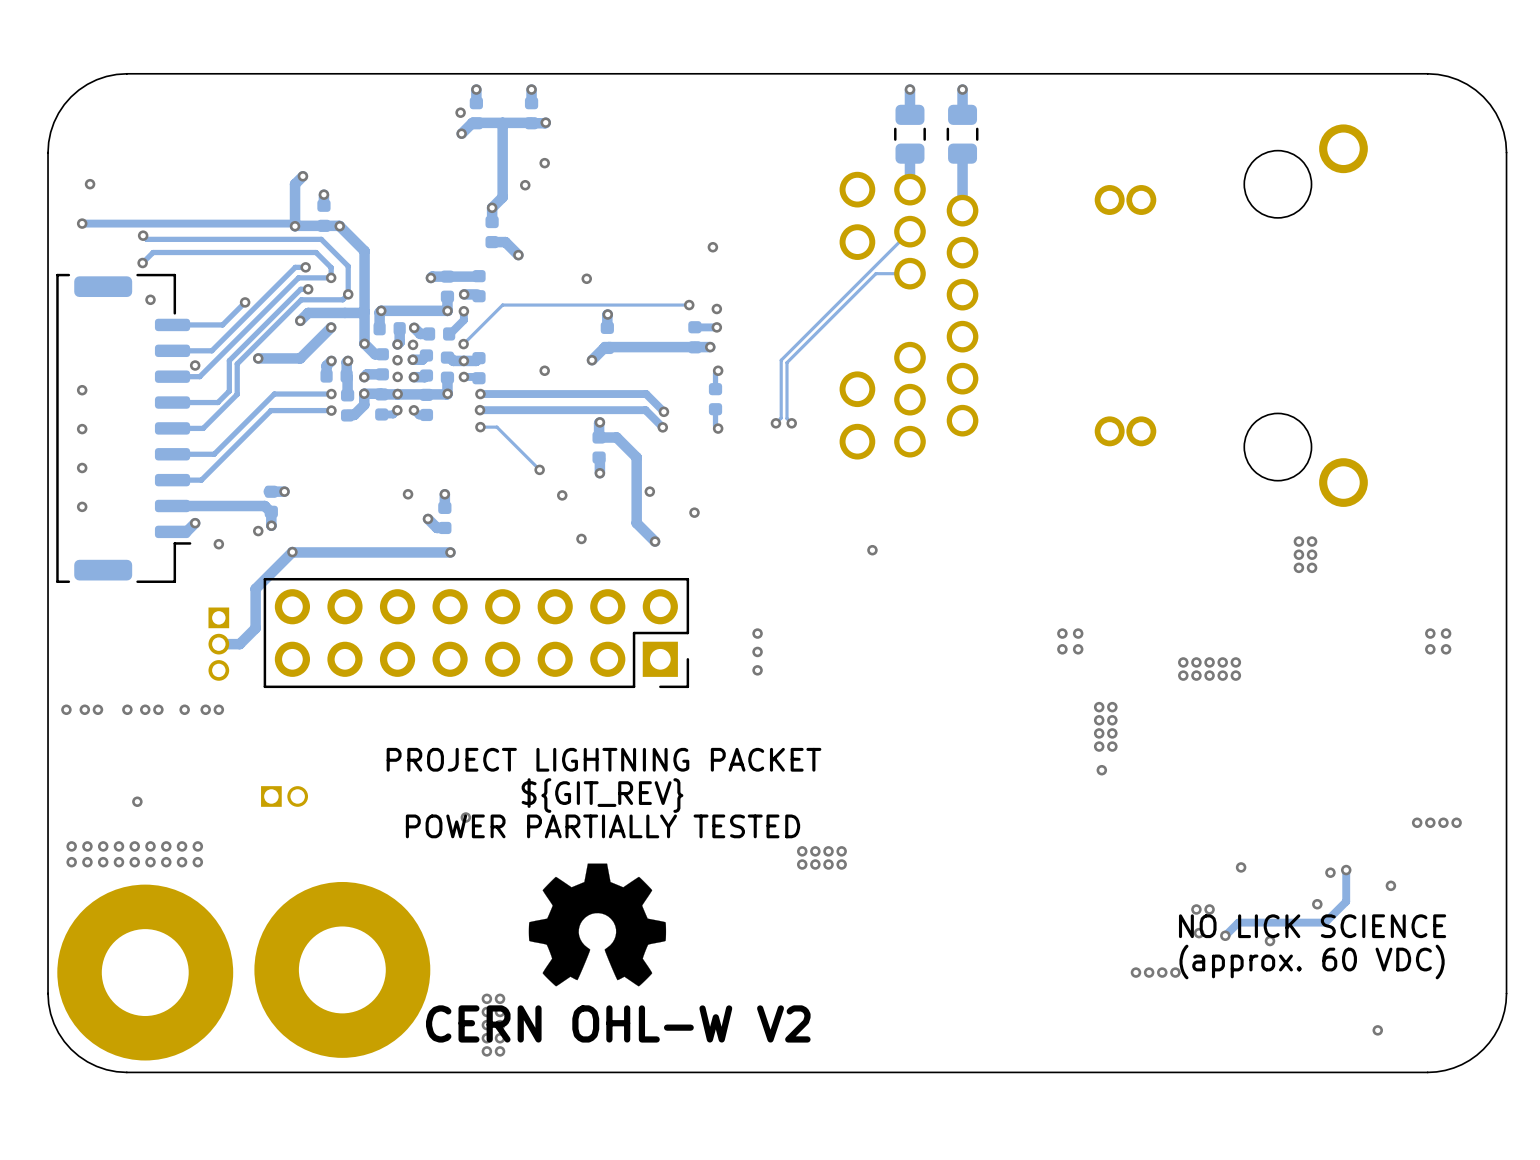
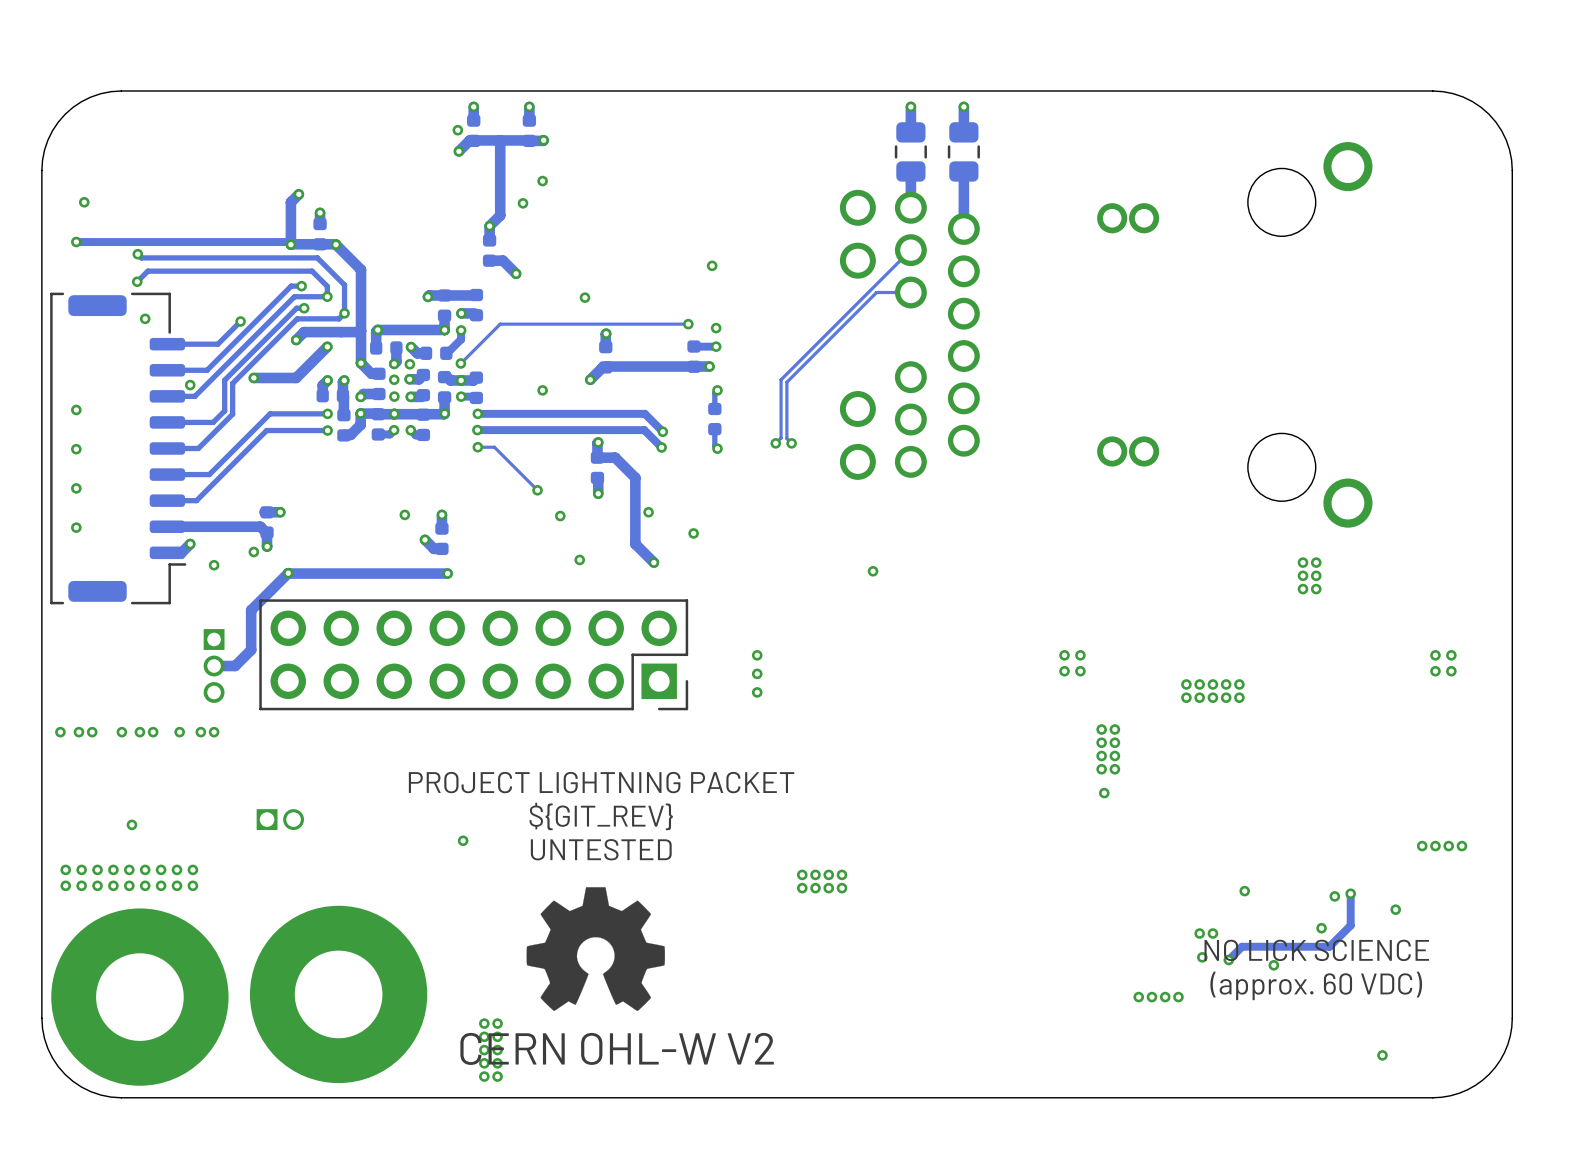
text: POWER PARTIALLY TESTED (603, 826) -> UNTESTED (601, 849)

